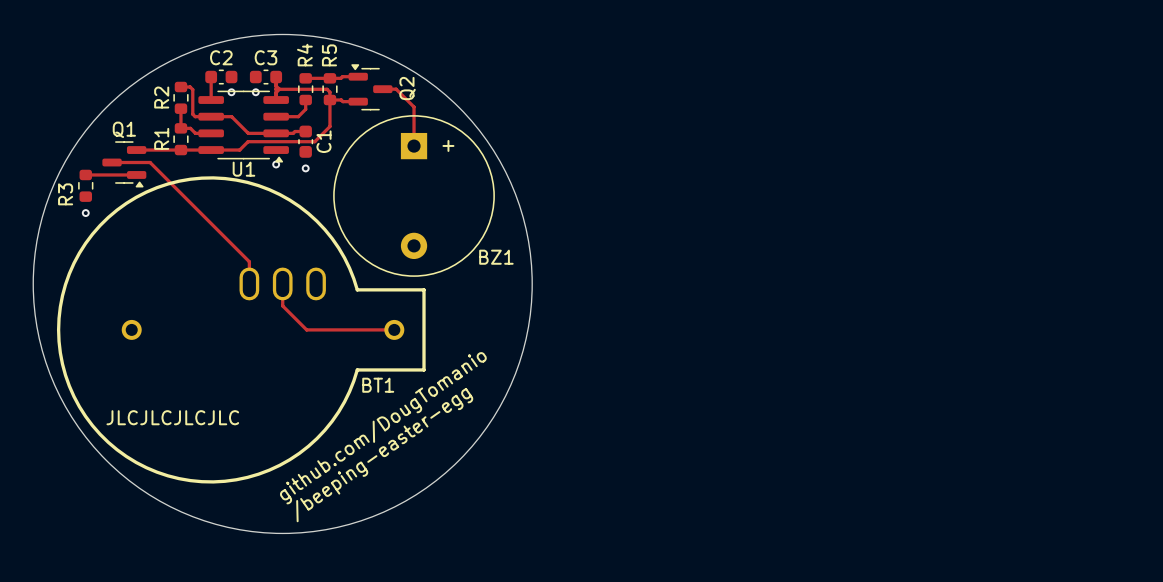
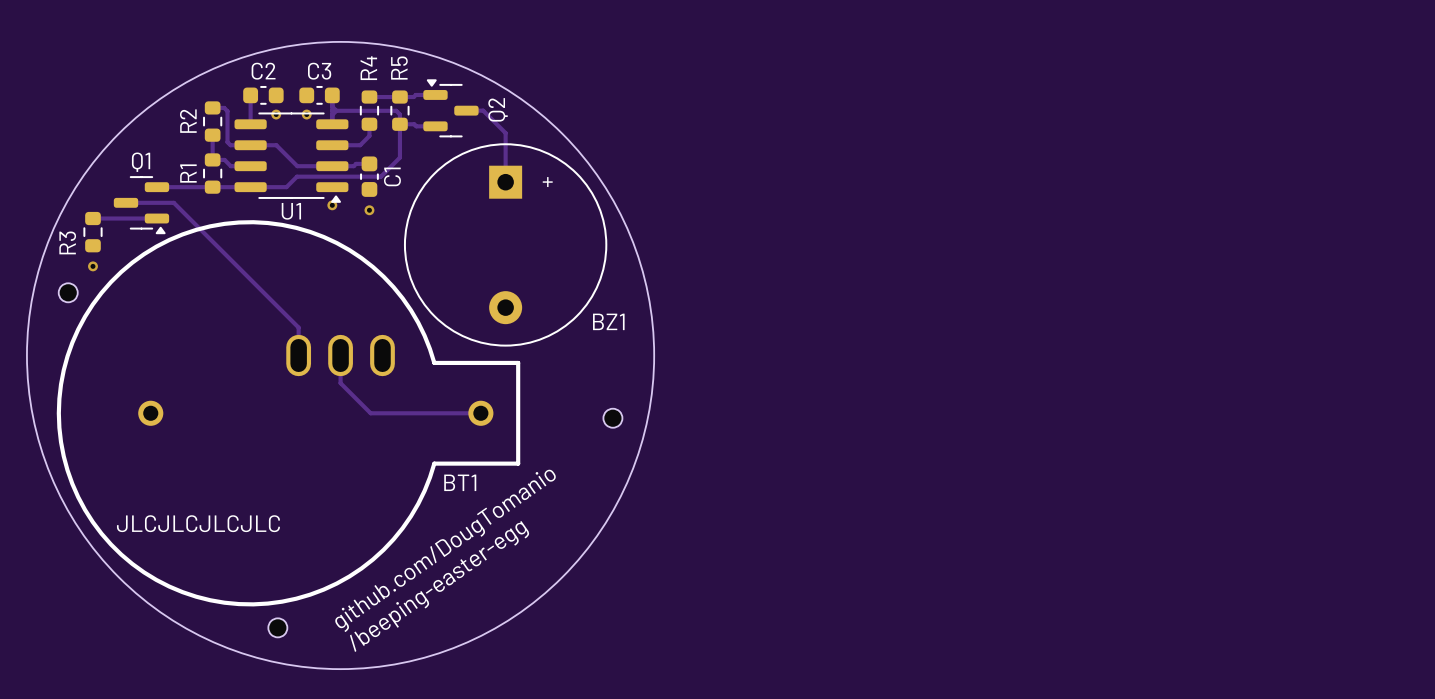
part: none -> (68, 292)
part: none -> (612, 418)
part: none -> (277, 627)

